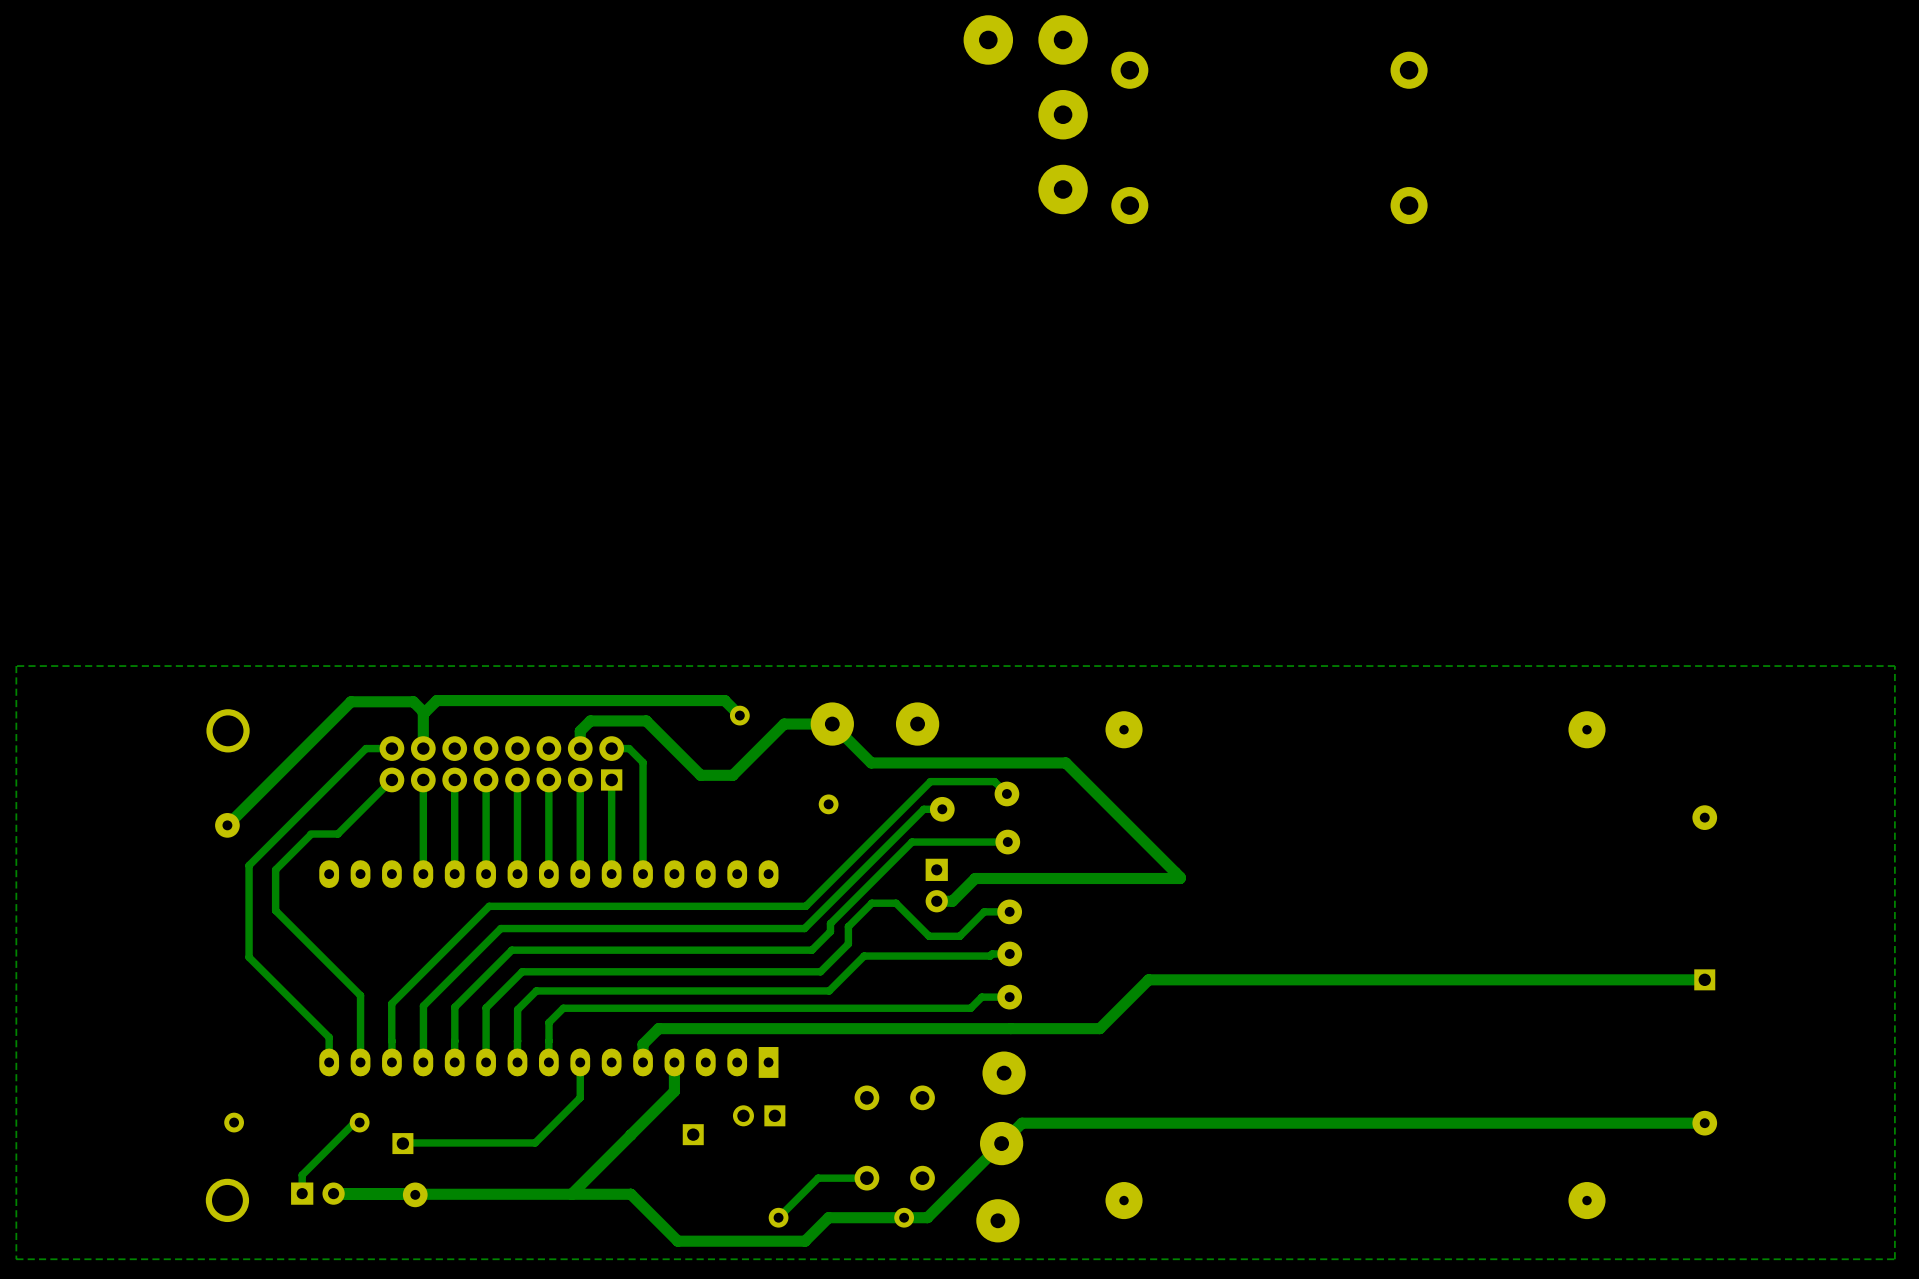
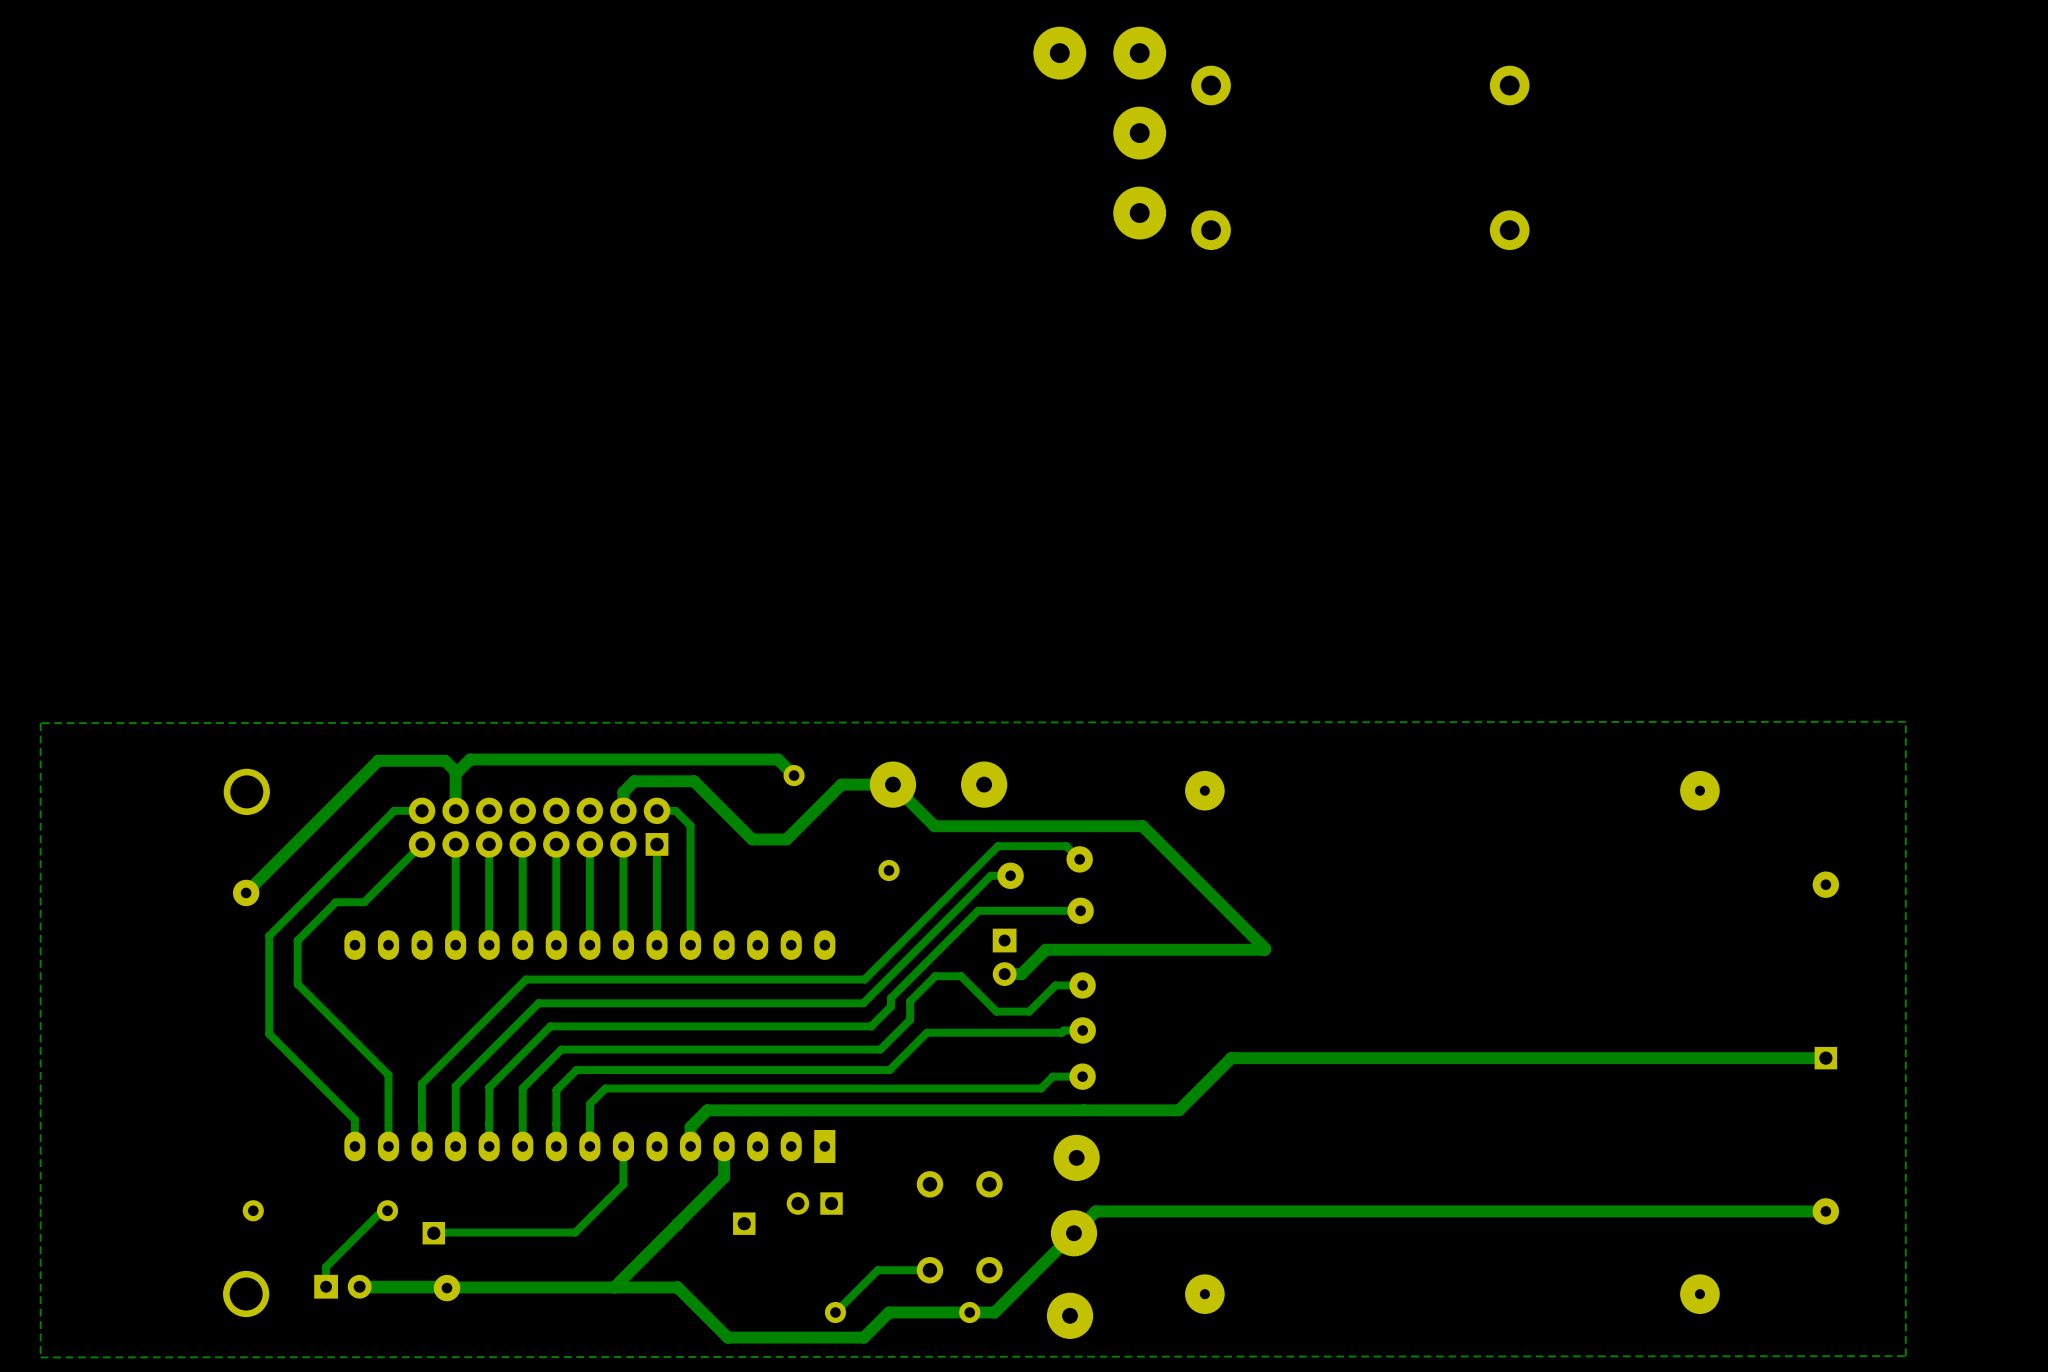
zone outline: (1894, 666) (16, 666) (16, 1259) (1894, 1259) (1894, 666) -> (1905, 721) (1905, 1356) (40, 1357) (40, 723) (1905, 721)

